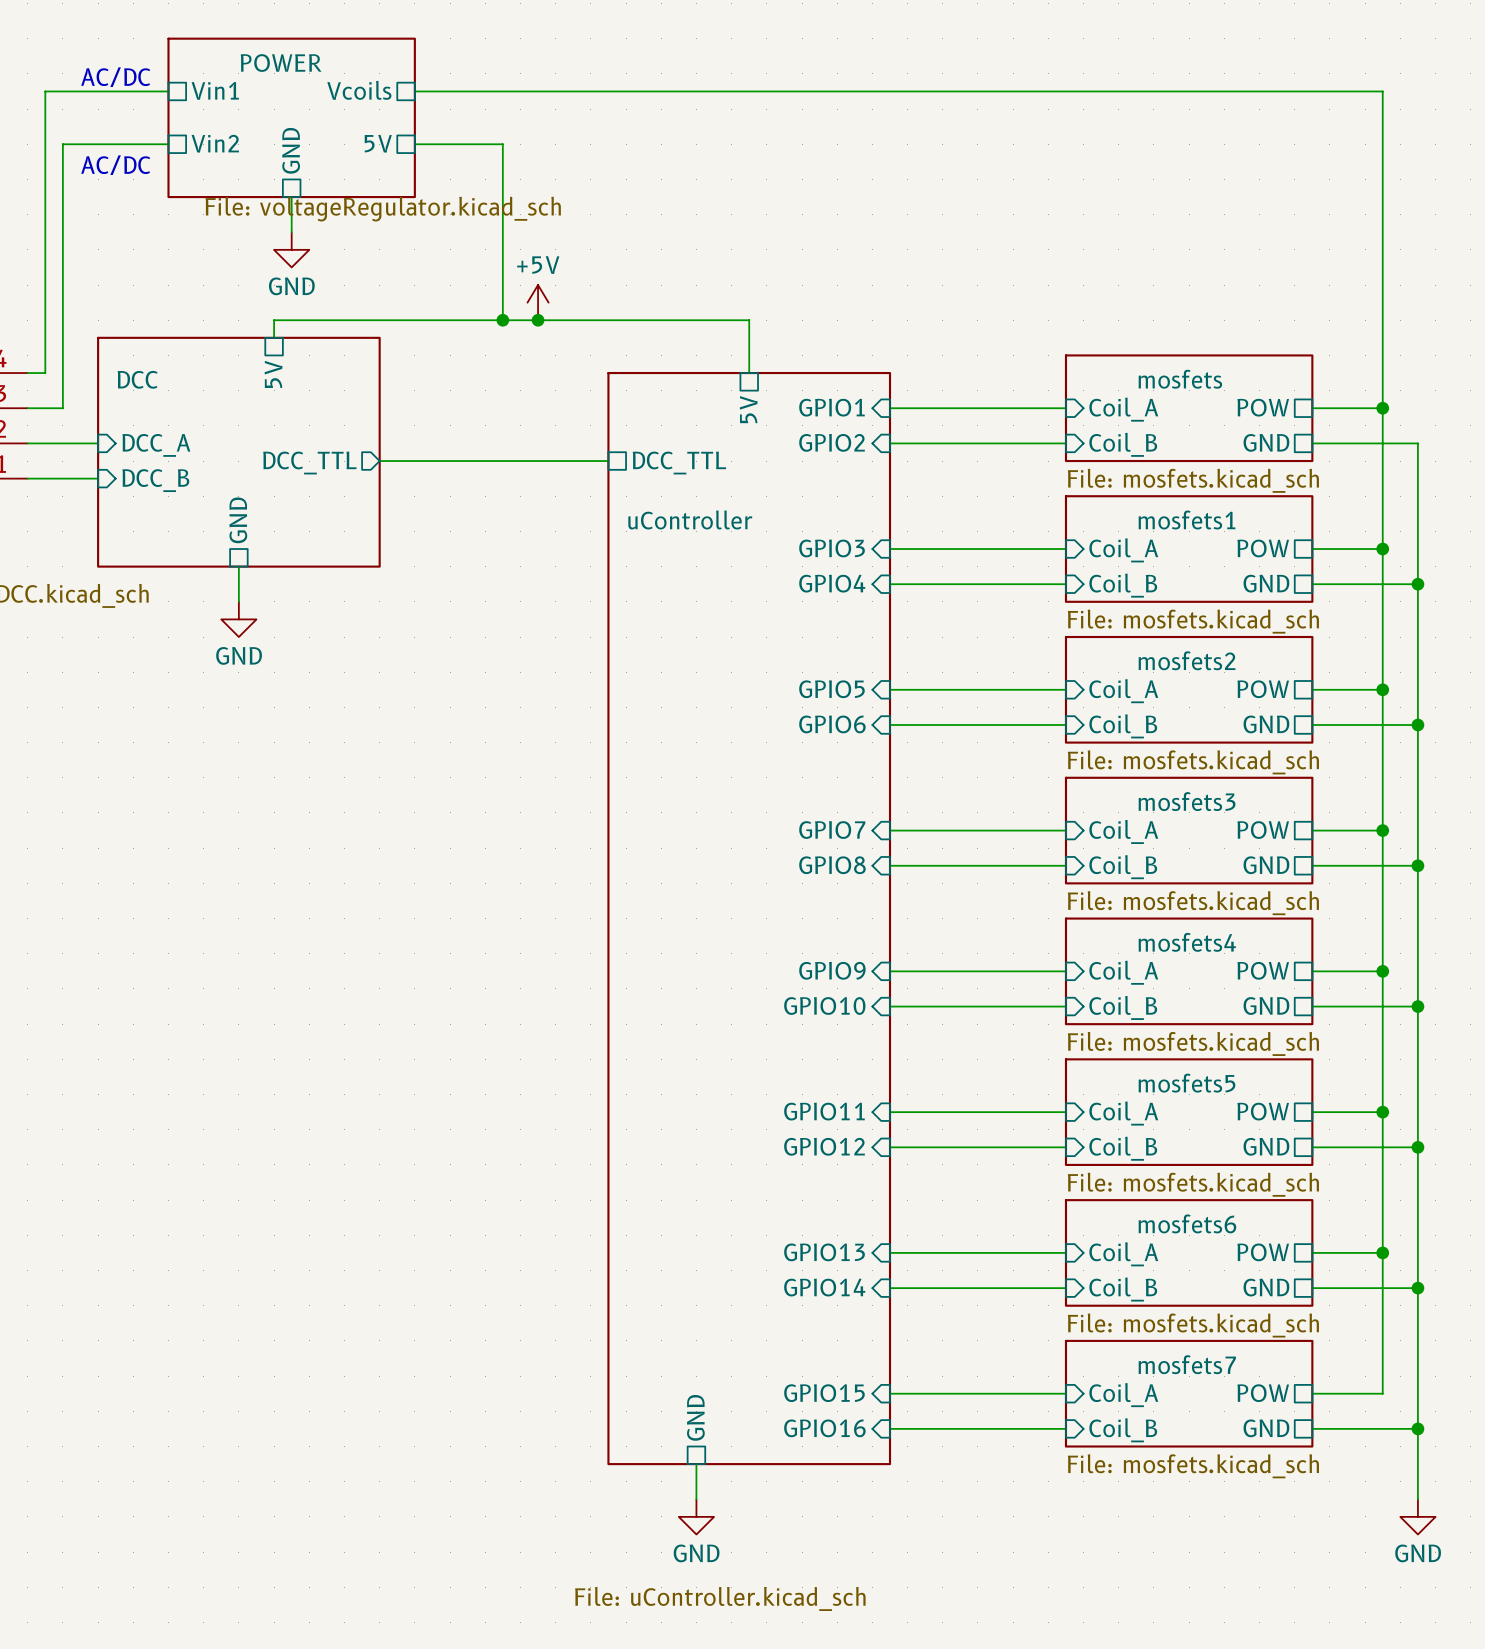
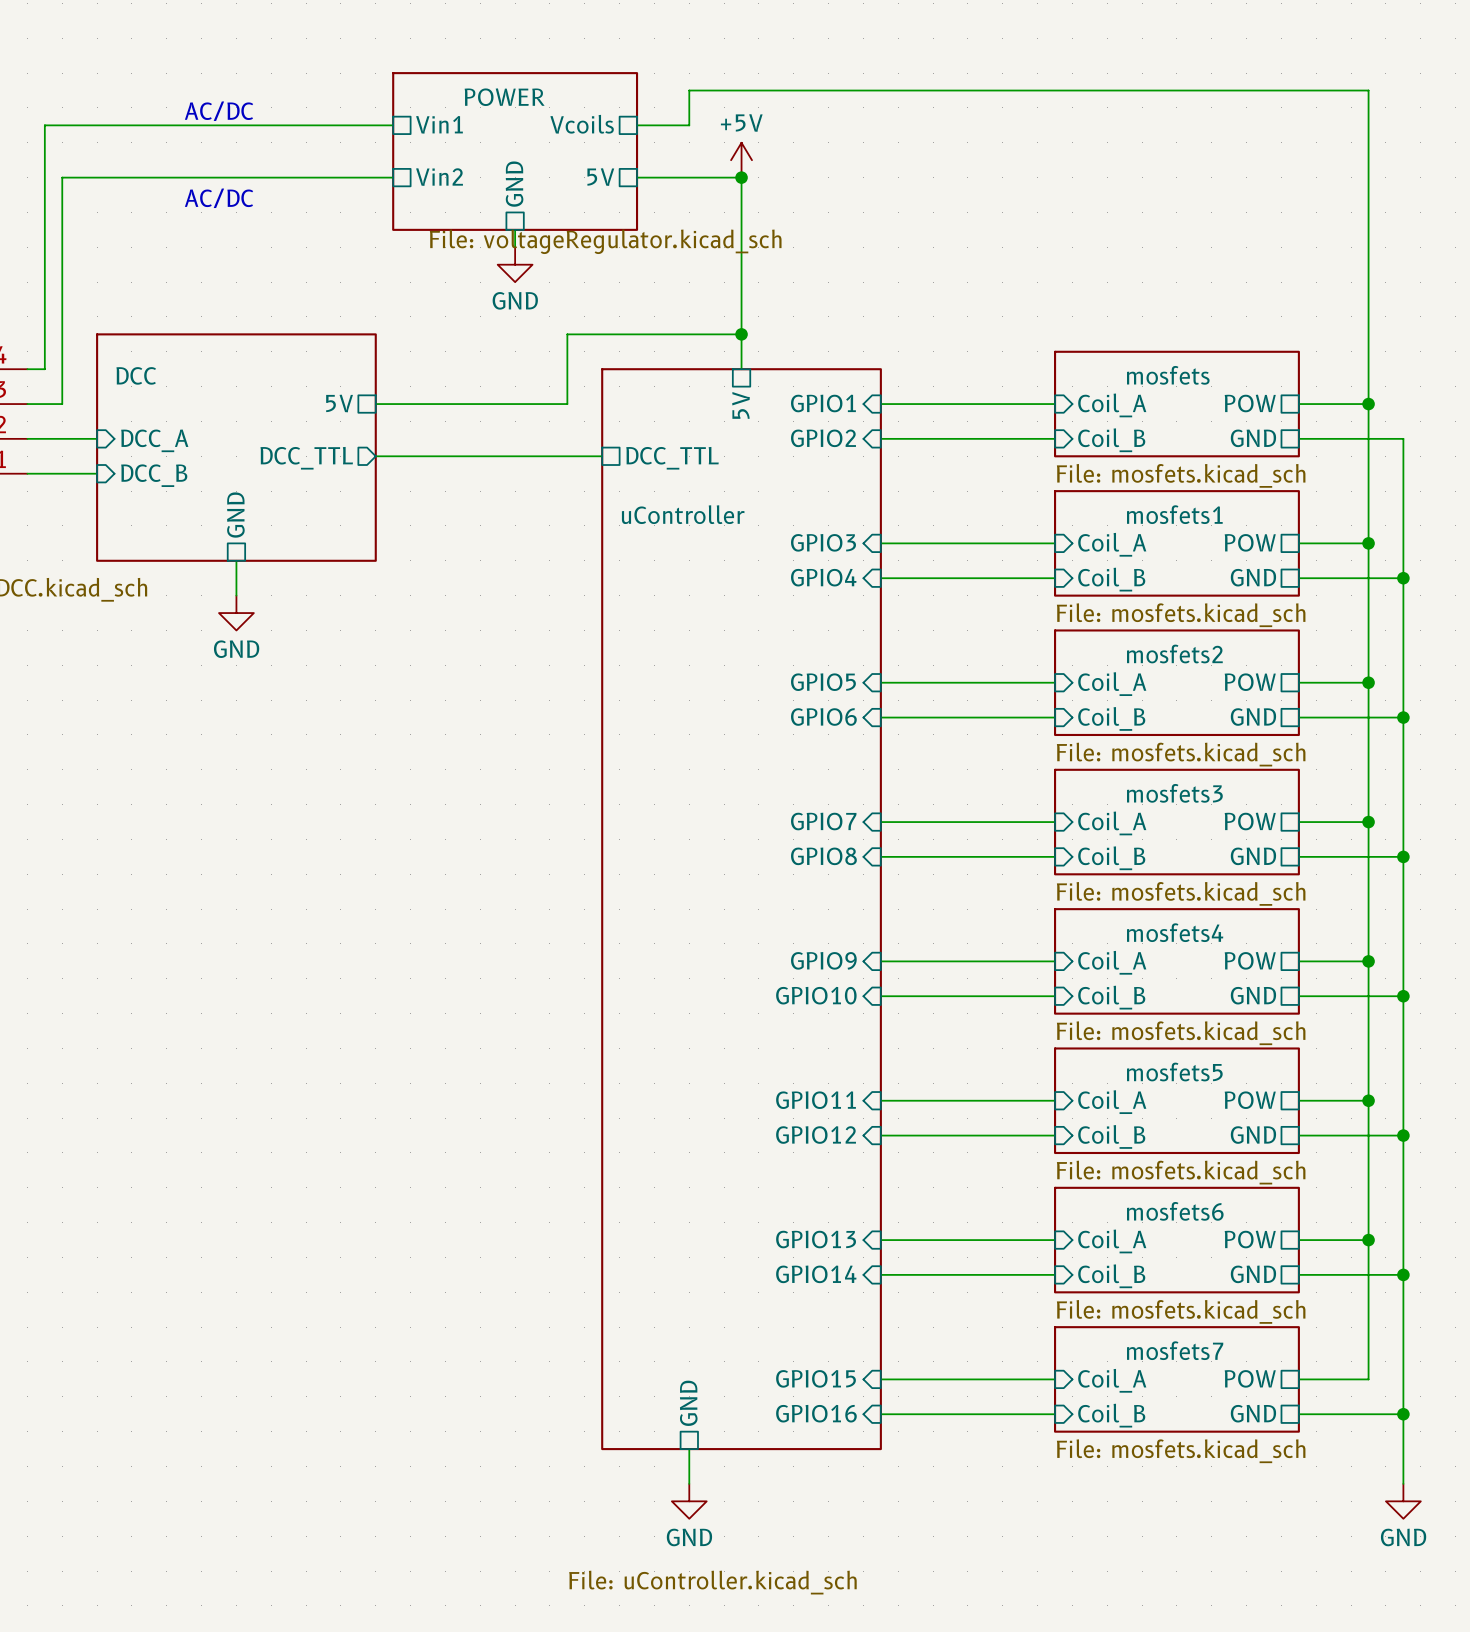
text: AC/DC (115, 77) -> none
sheet pin position: Vin1 (215, 90) -> Vin1 (439, 124)
sheet pin position: Vcoils (359, 90) -> Vcoils (582, 124)
wire: (168, 91) (45, 91) (45, 126) -> (393, 125) (44, 125)
wire: (414, 91) (696, 91) -> (637, 125) (689, 125) (689, 90)
text: none -> AC/DC (219, 111)
sheet POWER position: (291, 117) -> (515, 151)
sheet pin position: Vin2 (215, 143) -> Vin2 (439, 177)
sheet pin: 5V (378, 143) -> none
wire: (168, 144) (62, 144) (62, 179) -> (393, 177) (62, 177)
wire: (414, 144) (502, 144) (502, 320) -> none
sheet pin position: GND (291, 150) -> GND (514, 184)
text: AC/DC (115, 165) -> none
sheet pin: none -> 5V (600, 177)
junction: none -> (741, 177)
wire: (291, 197) (291, 232) -> none
text: none -> AC/DC (219, 198)
wire: none -> (515, 229) (515, 247)
power symbol position: GND (291, 249) -> GND (515, 264)
power symbol position: +5V (538, 302) -> +5V (741, 160)
junction: (502, 320) -> none
junction: (538, 320) -> none
wire: (749, 320) (274, 320) (274, 337) -> (741, 316) (741, 177) (637, 177)
wire: none -> (741, 334) (567, 334) (567, 404) (375, 404)
junction: none -> (741, 334)
sheet pin rotation: 0° (273, 374) -> 90° clockwise (339, 403)
sheet pin position: 5V (273, 374) -> 5V (339, 403)

